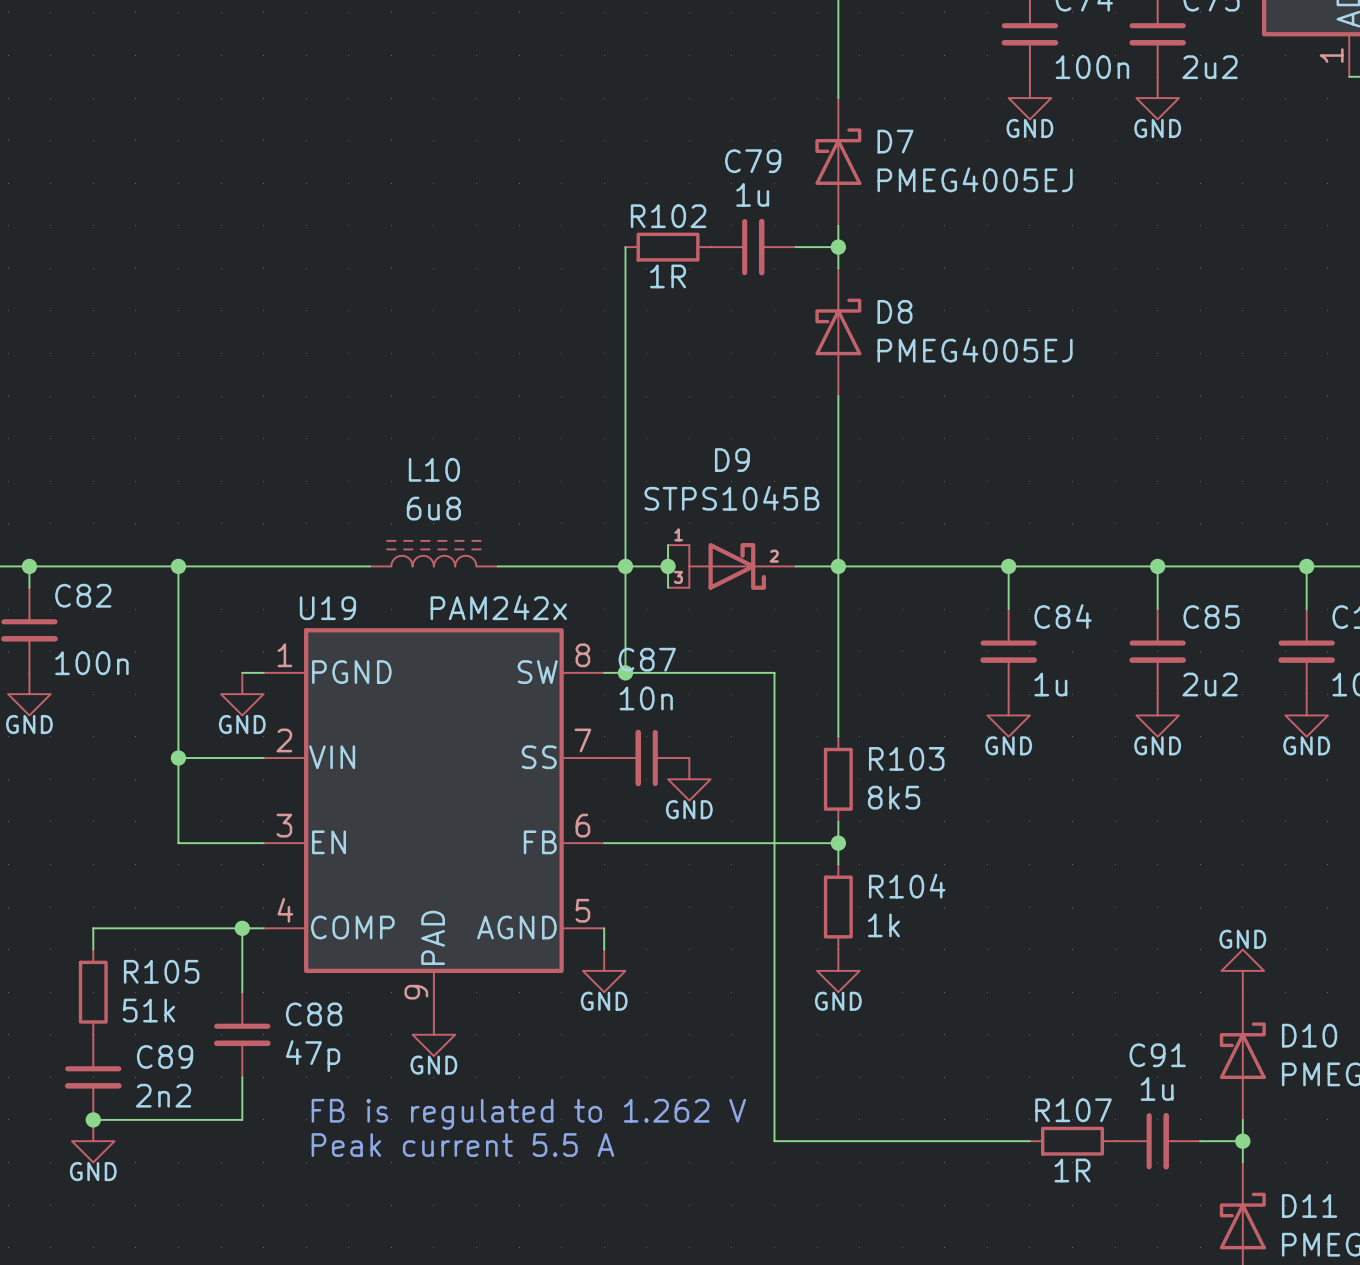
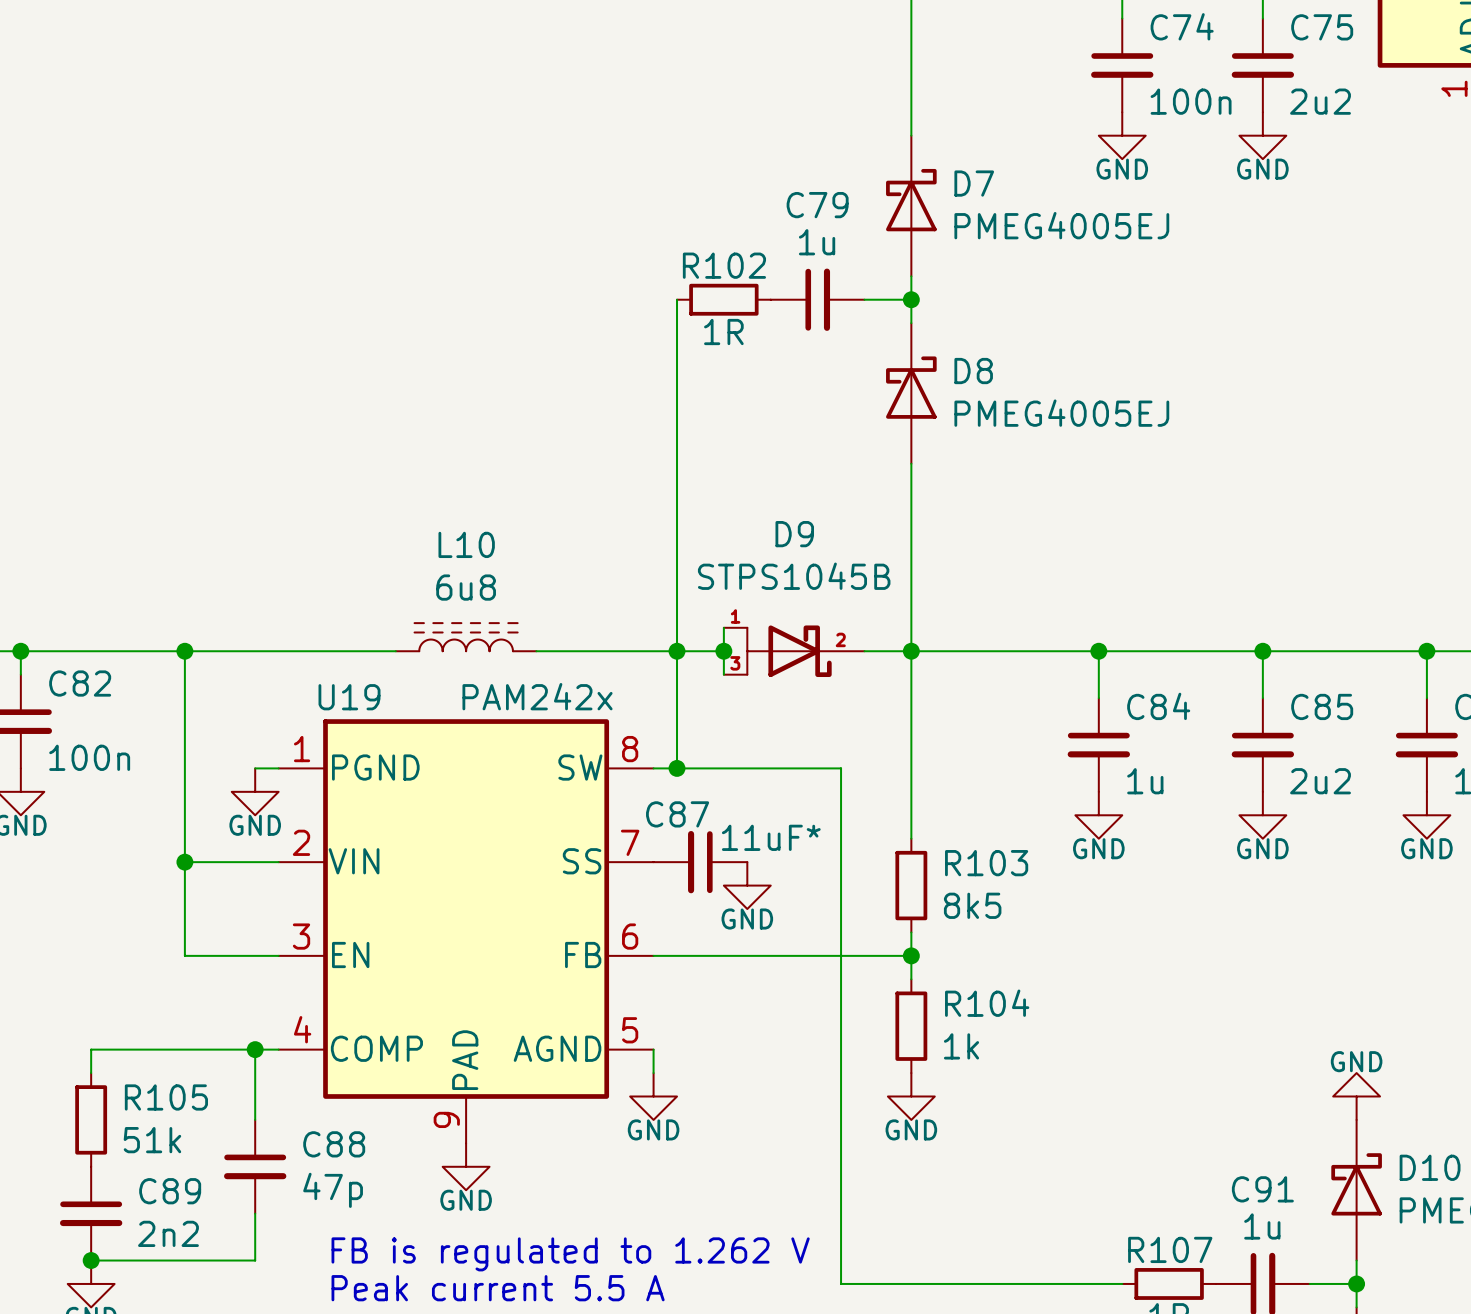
C87 name position: C87 (647, 659) -> C87 (677, 814)
C87 value: 10n (646, 698) -> 11uF* (771, 837)

